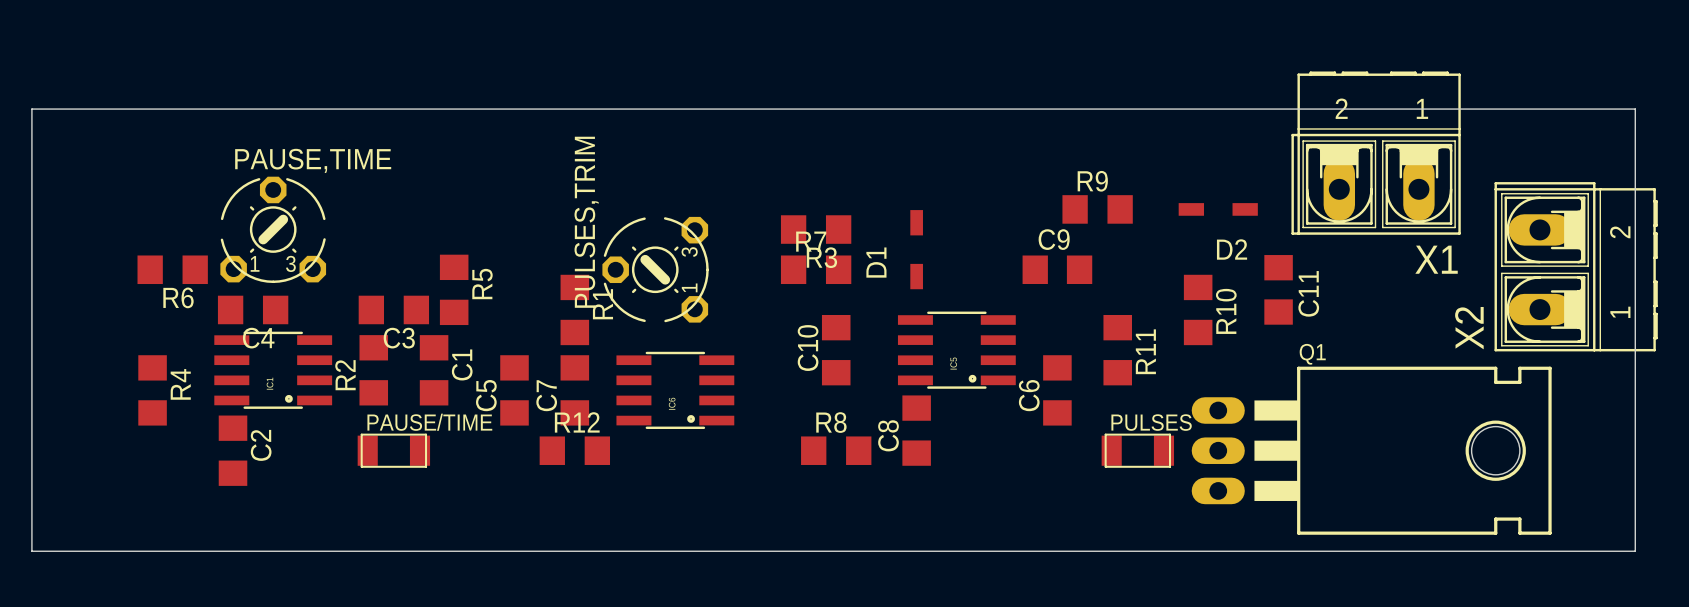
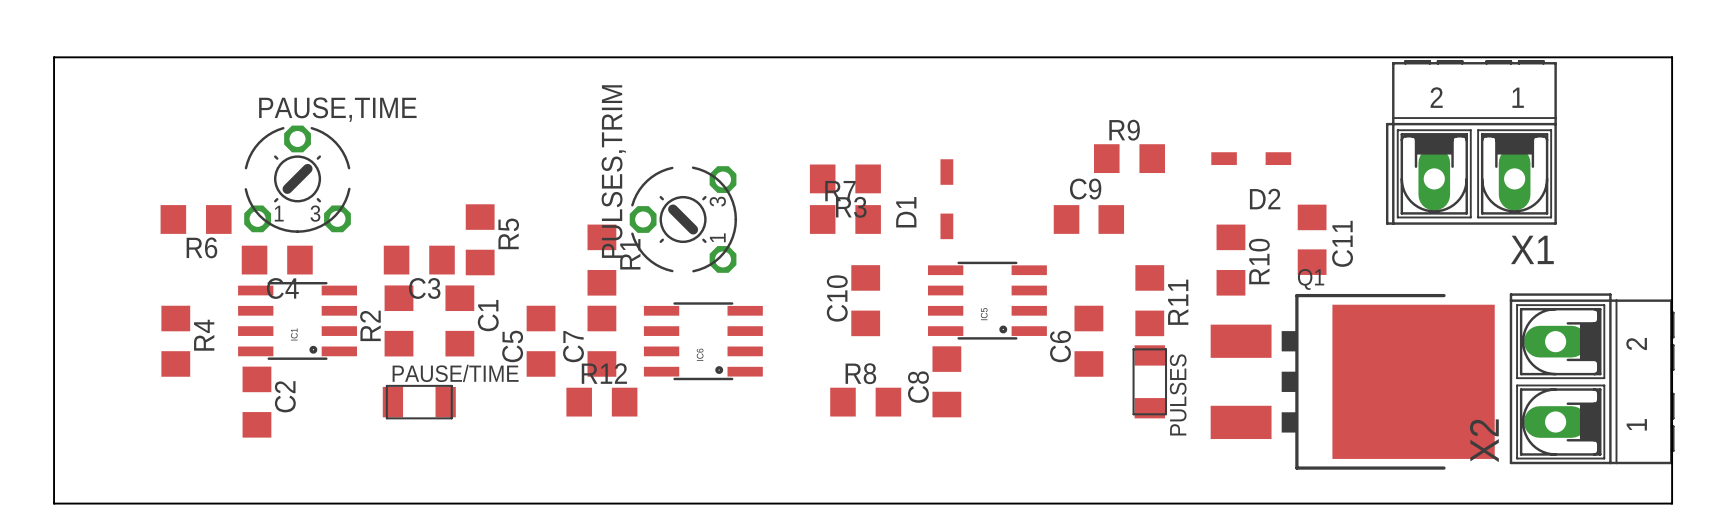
X1 position: (1376, 153) -> (1471, 142)
X2 position: (1576, 266) -> (1592, 378)
Q1 footprint: [1191, 366, 1552, 535] -> [1210, 293, 1495, 470]
PULSES rotation: 0° (1137, 450) -> 90° clockwise (1149, 381)

